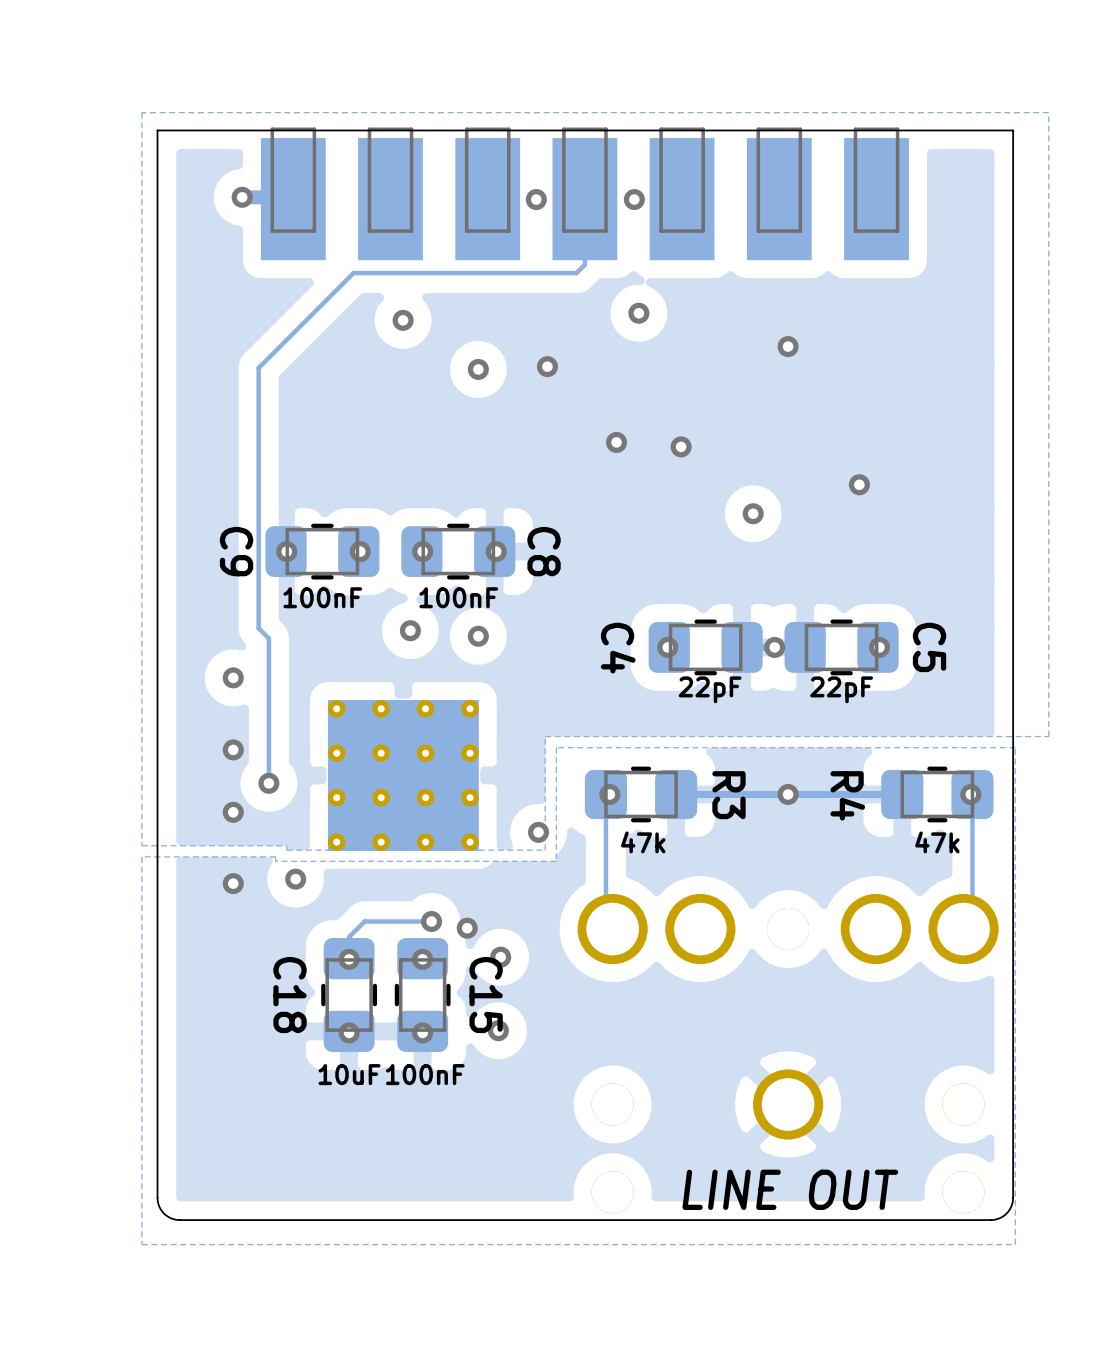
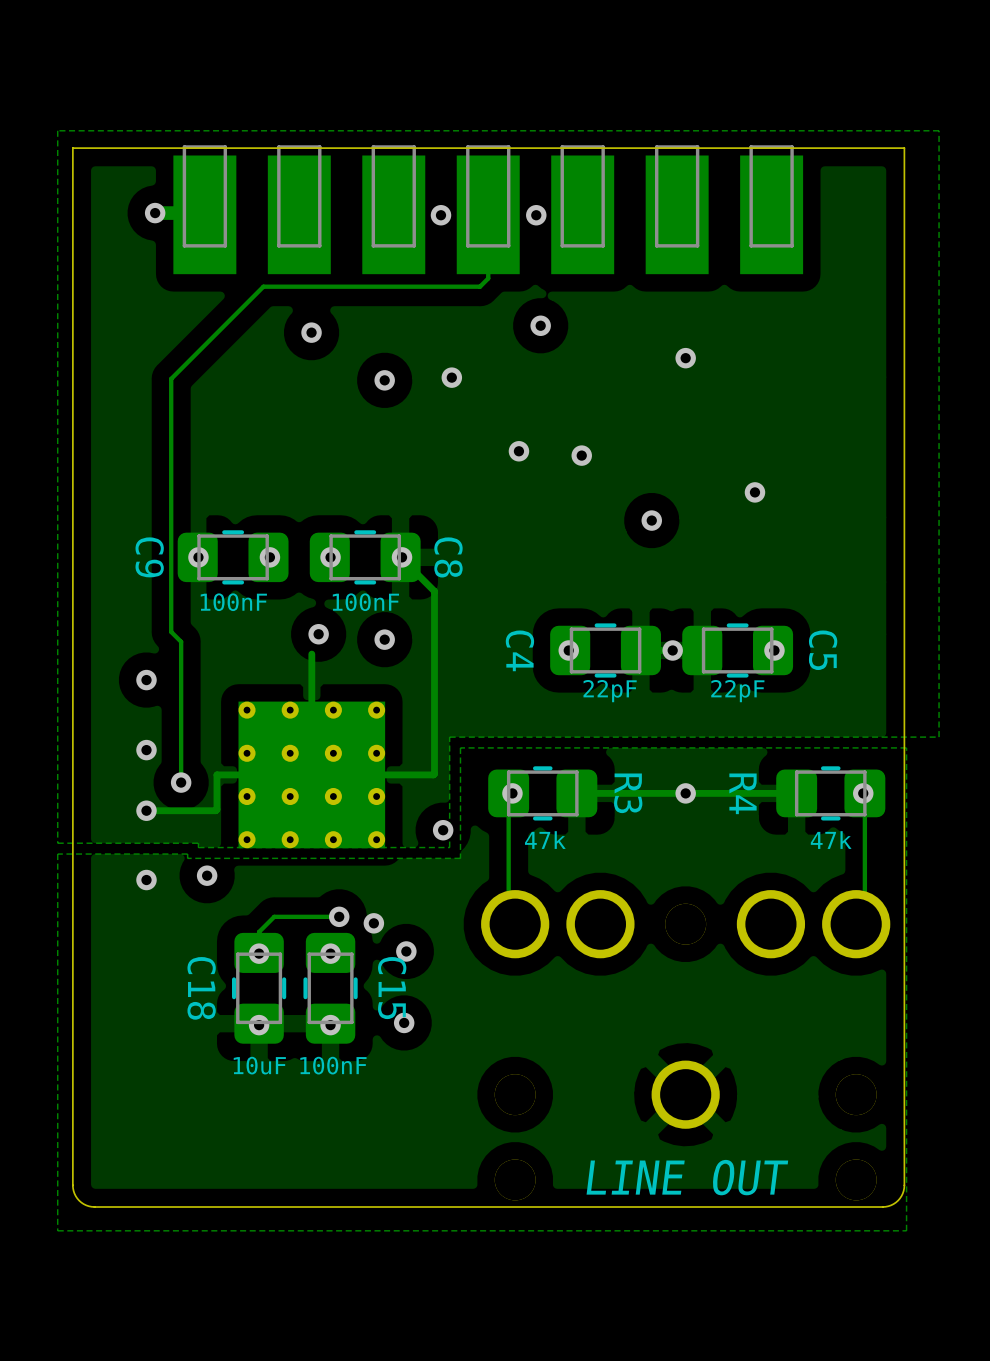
track: none -> (400, 557) (434, 591) (433, 774) (216, 774) (215, 810) (146, 810)
track: none -> (311, 654) (311, 774)

